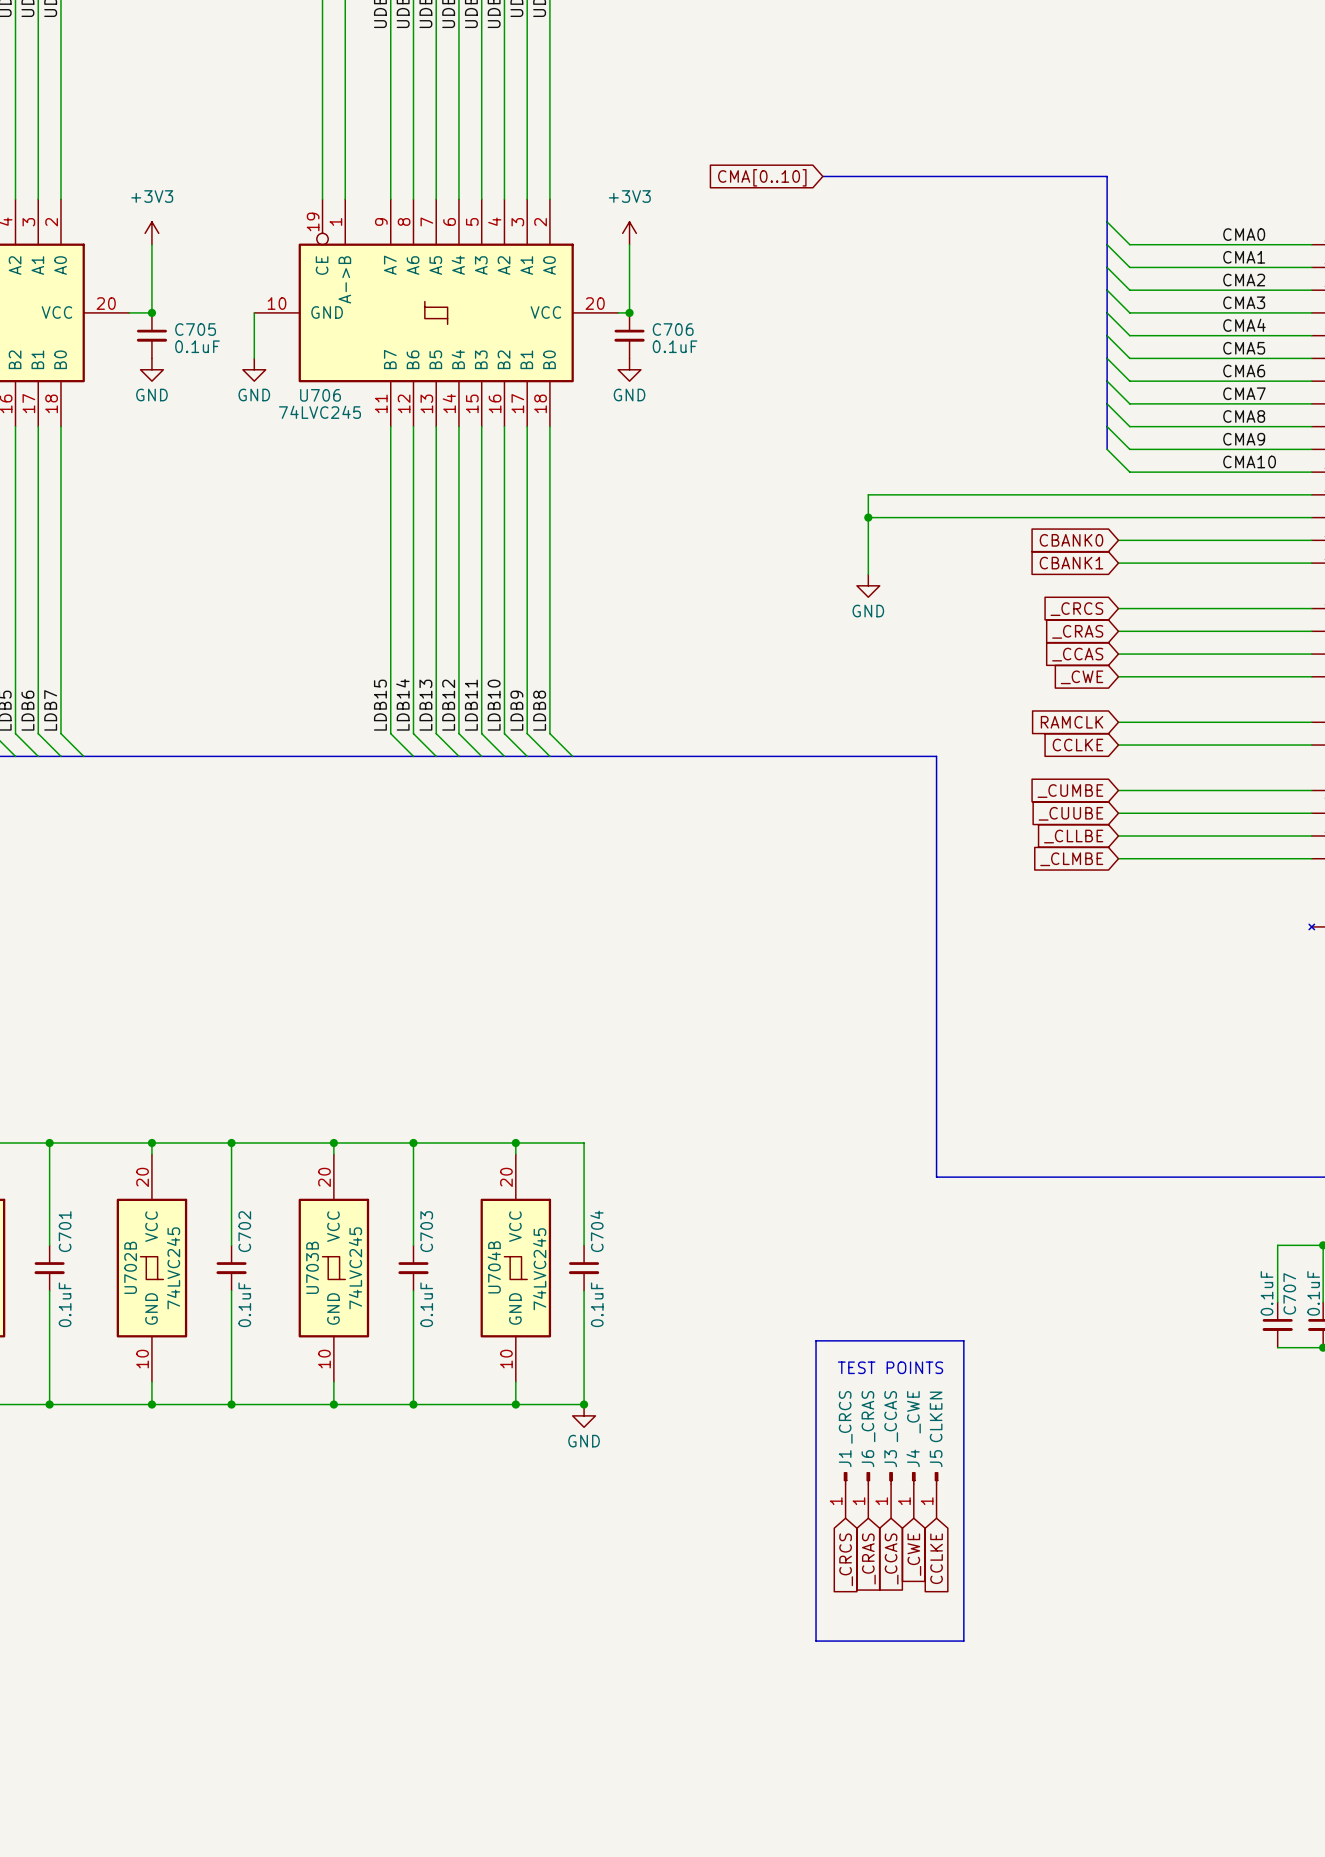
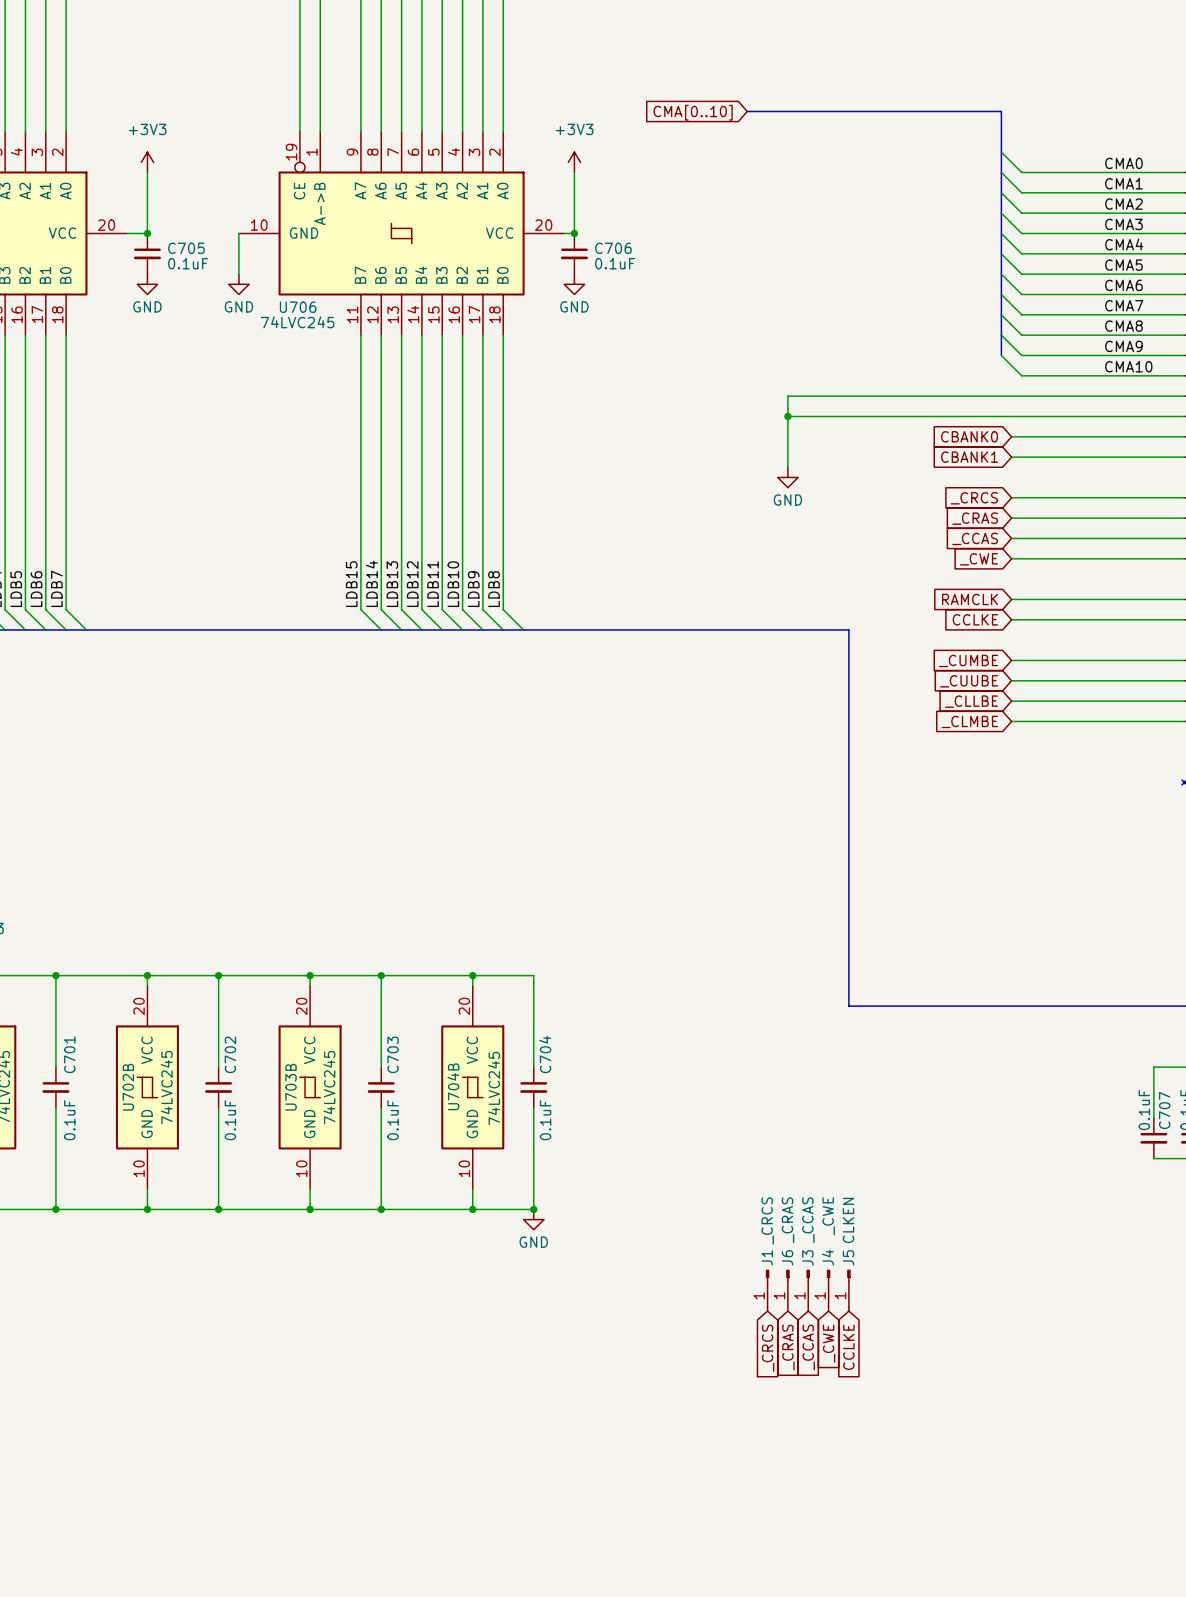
line: (816, 1340) (963, 1340) (963, 1641) (816, 1641) (816, 1340) -> none
text: TEST POINTS (890, 1367) -> none

